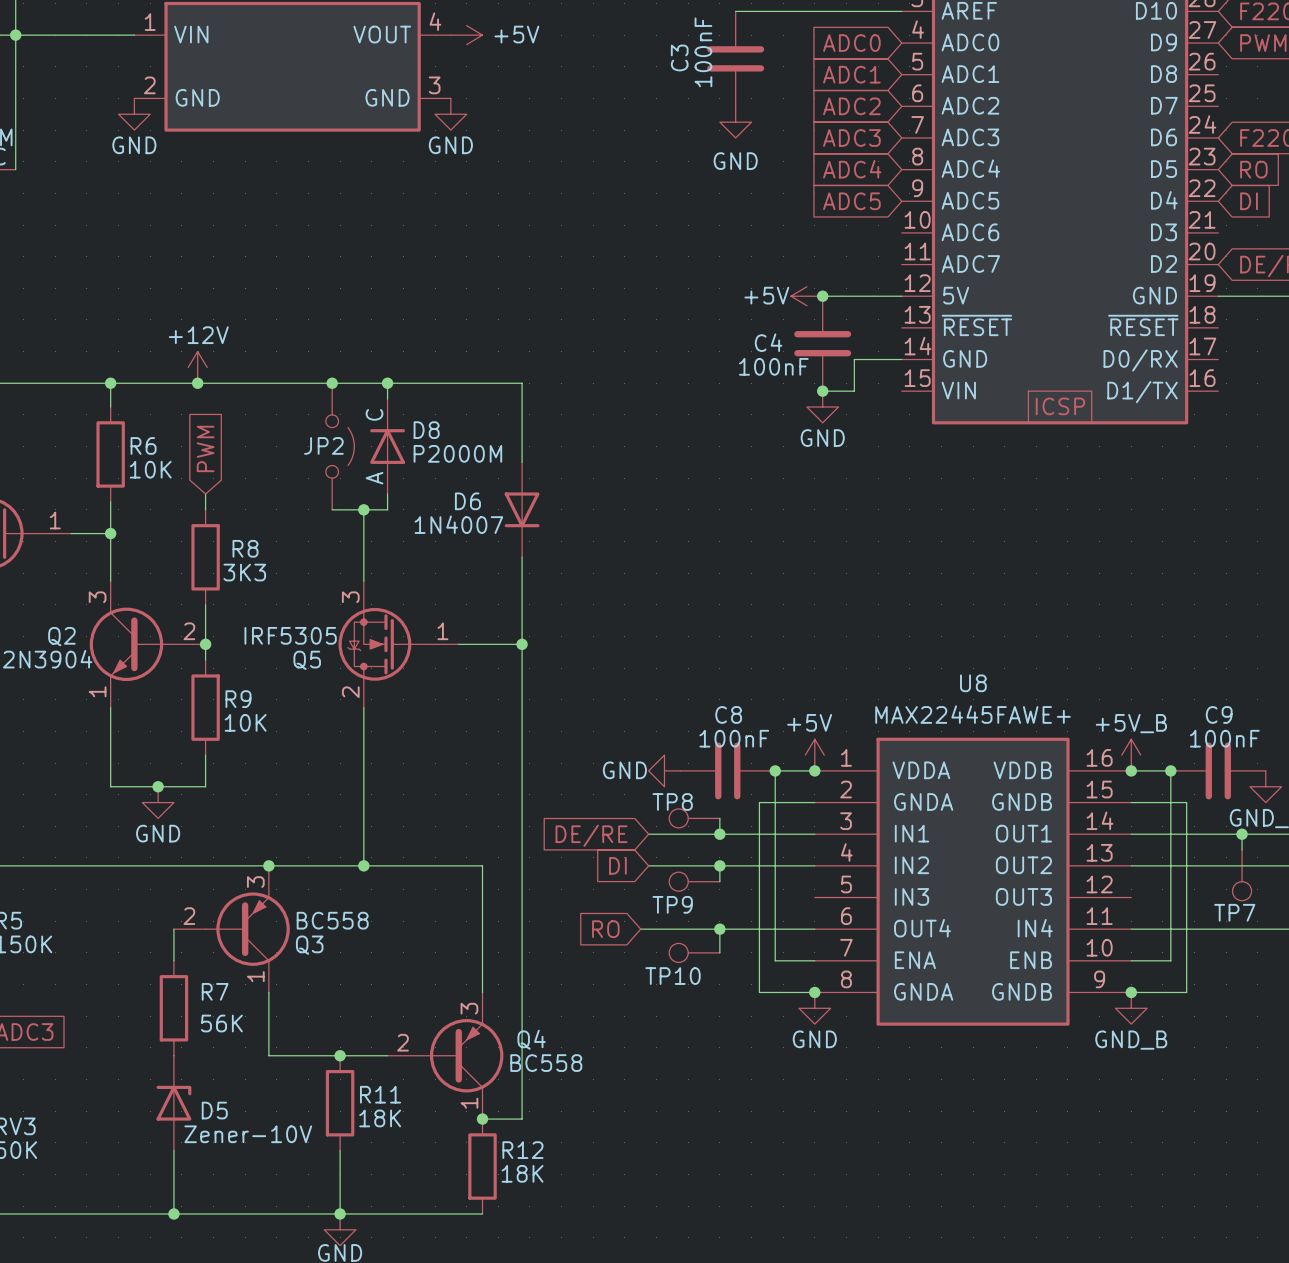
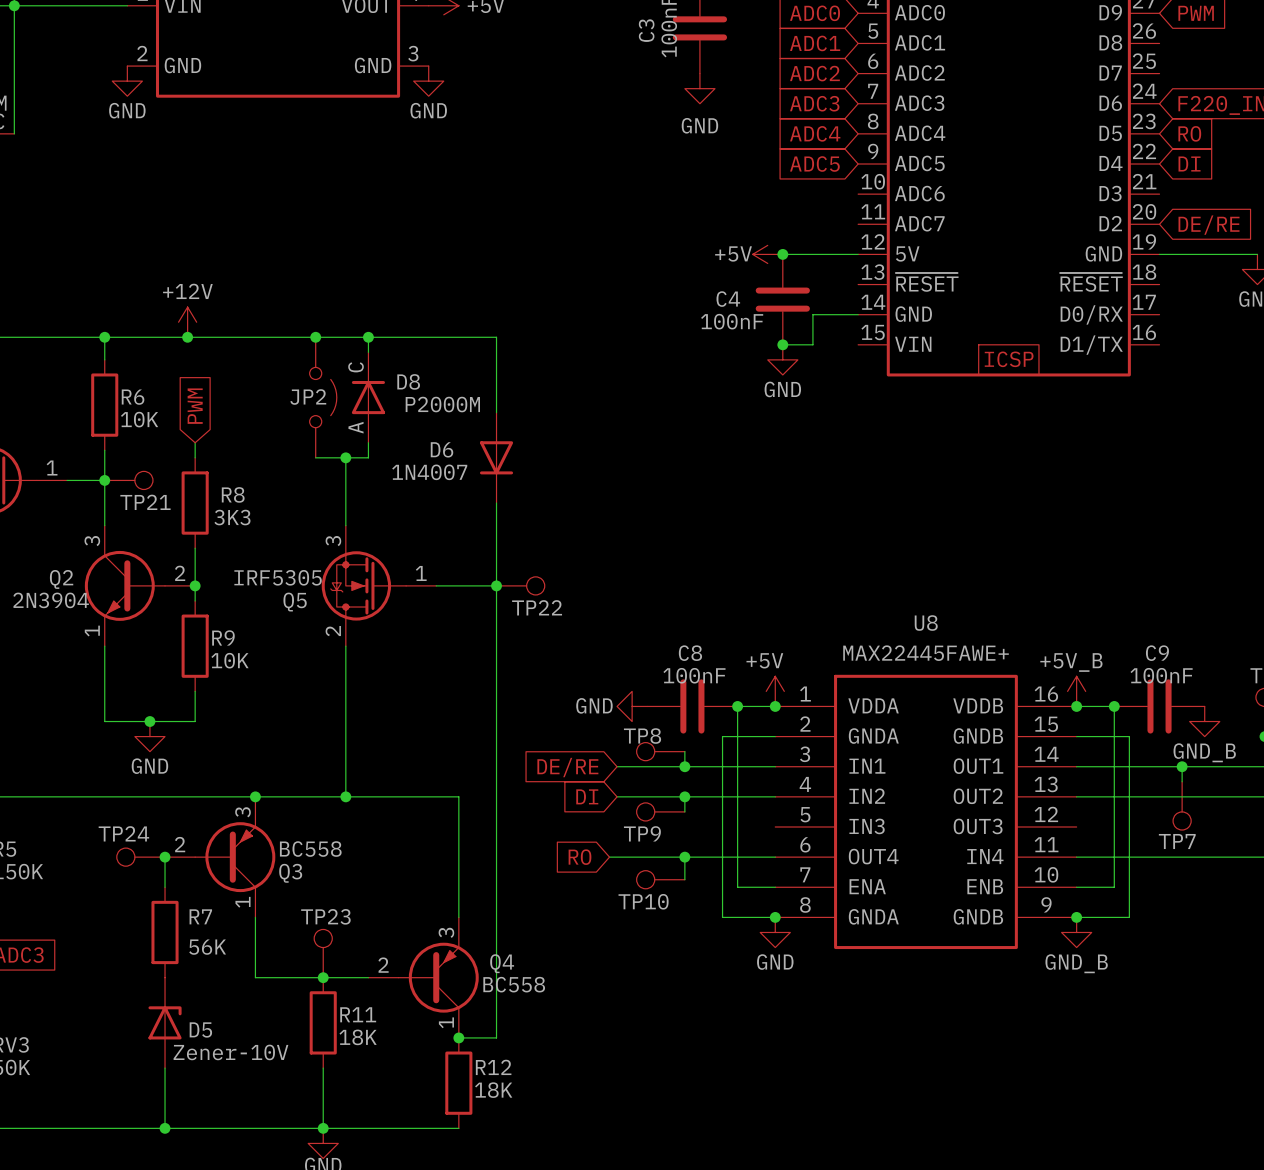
TP21: none -> (128, 480)
TP22: none -> (520, 585)
TP24: none -> (140, 857)
junction: none -> (165, 857)
TP23: none -> (323, 953)

